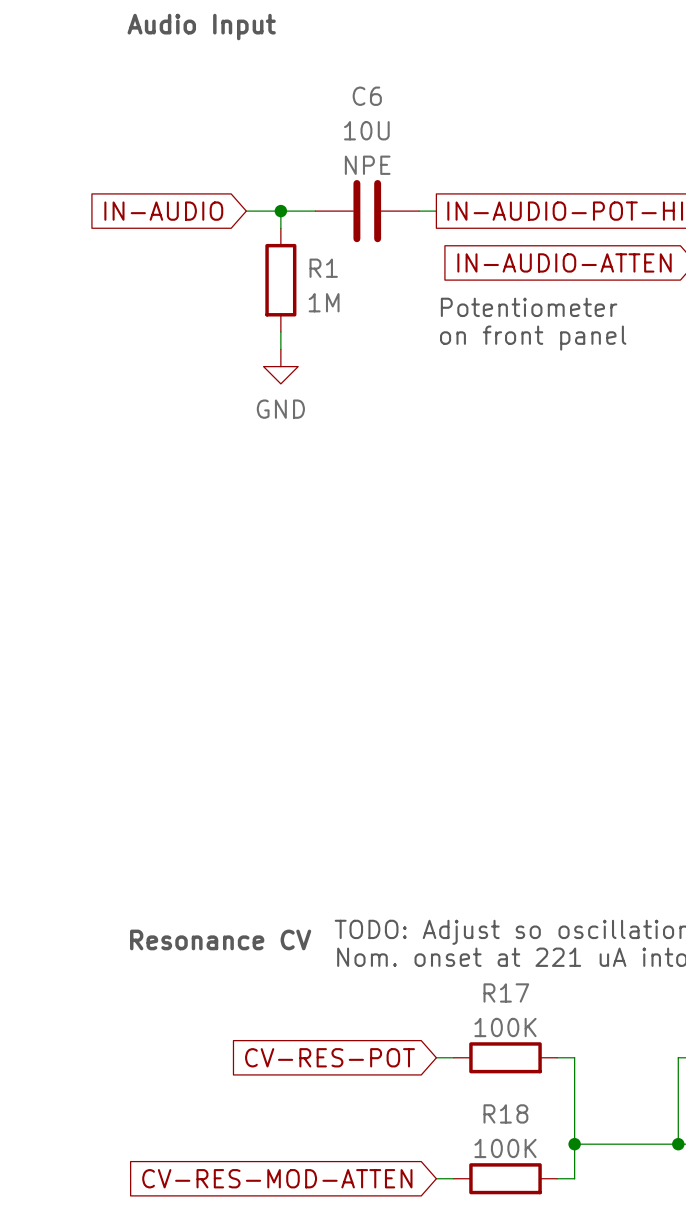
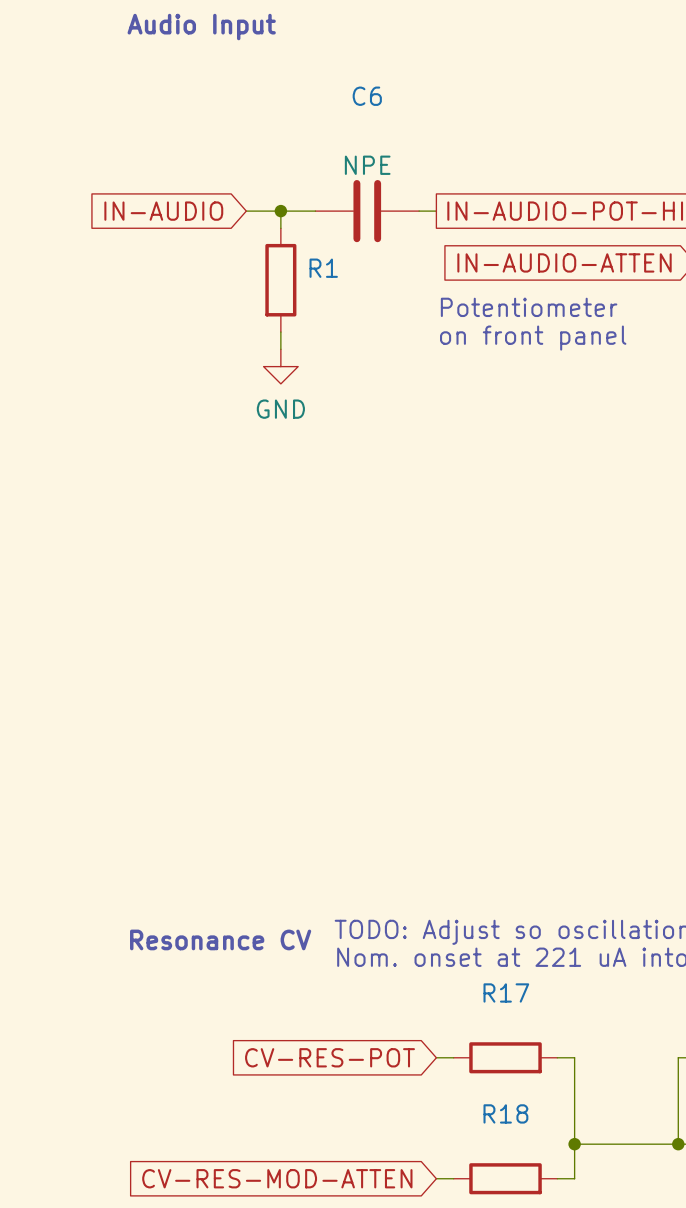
C6 value: 10U (366, 130) -> none
R1 value: 1M (324, 302) -> none
R17 value: 100K (505, 1027) -> none
R18 value: 100K (505, 1148) -> none

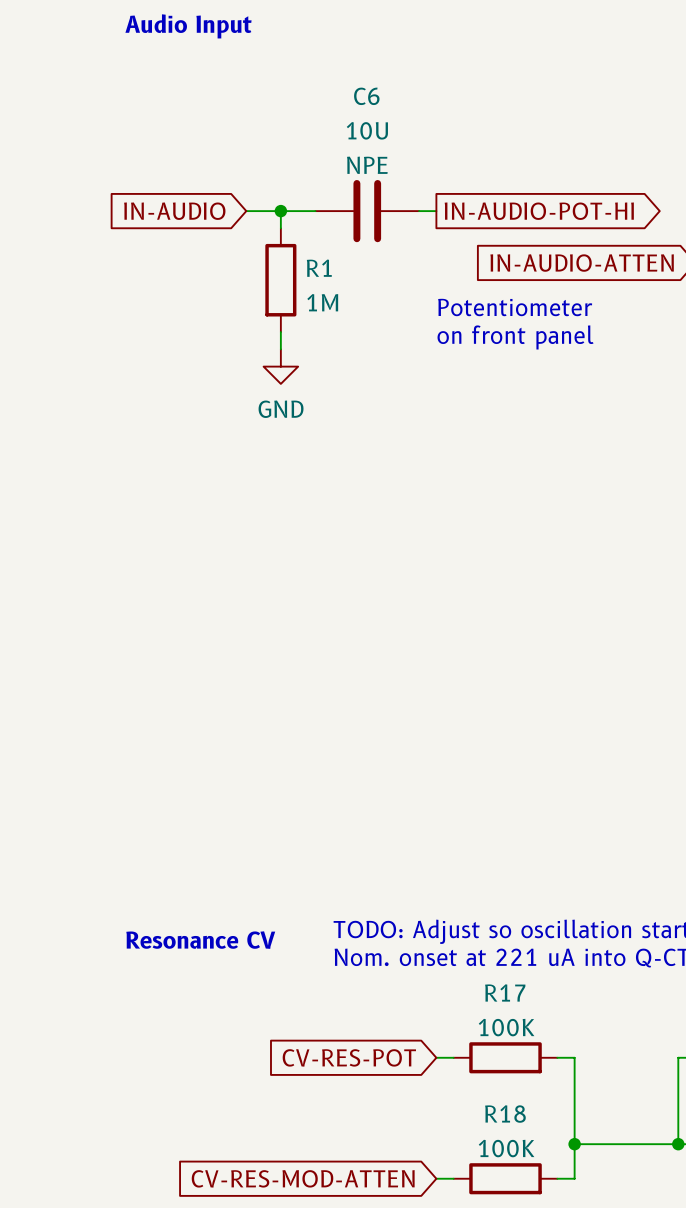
C6 value: none -> 10U (367, 130)
R1 value: none -> 1M (322, 302)
R17 value: none -> 100K (506, 1027)
R18 value: none -> 100K (506, 1148)

